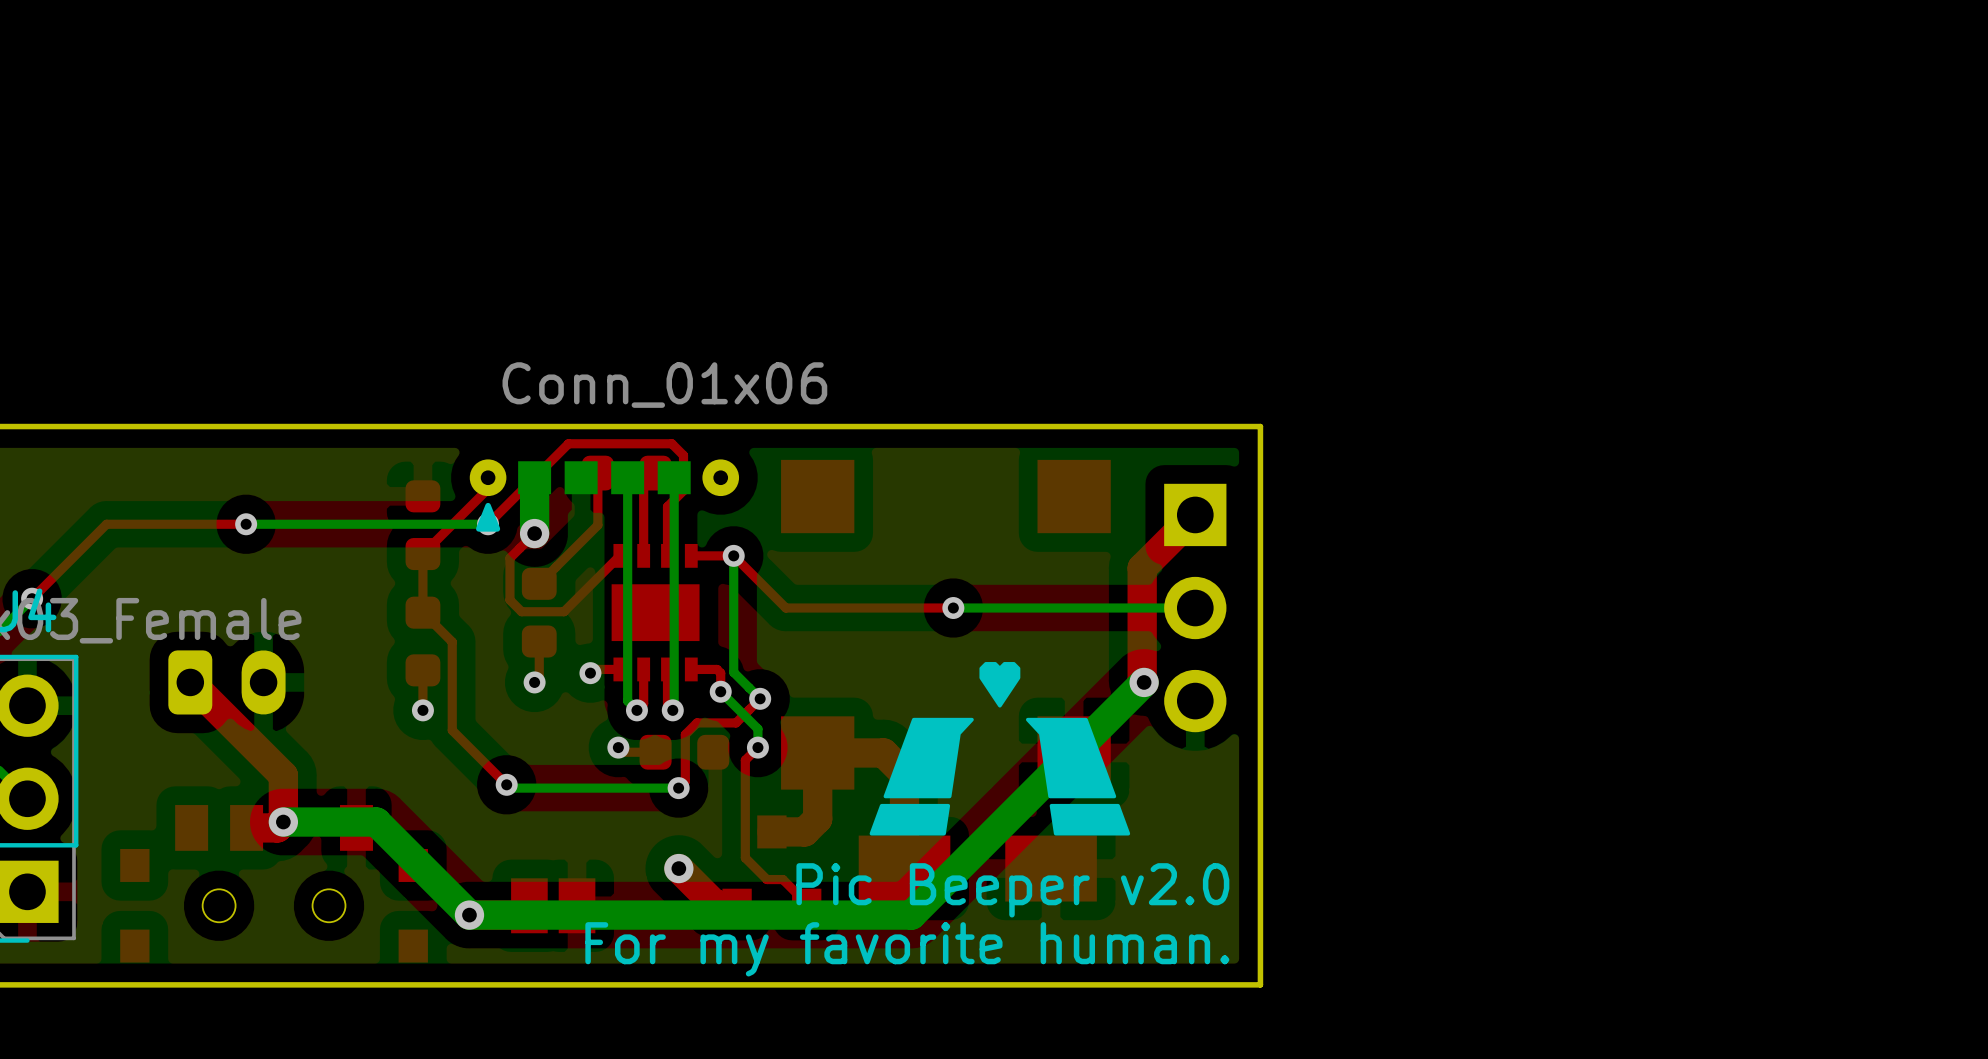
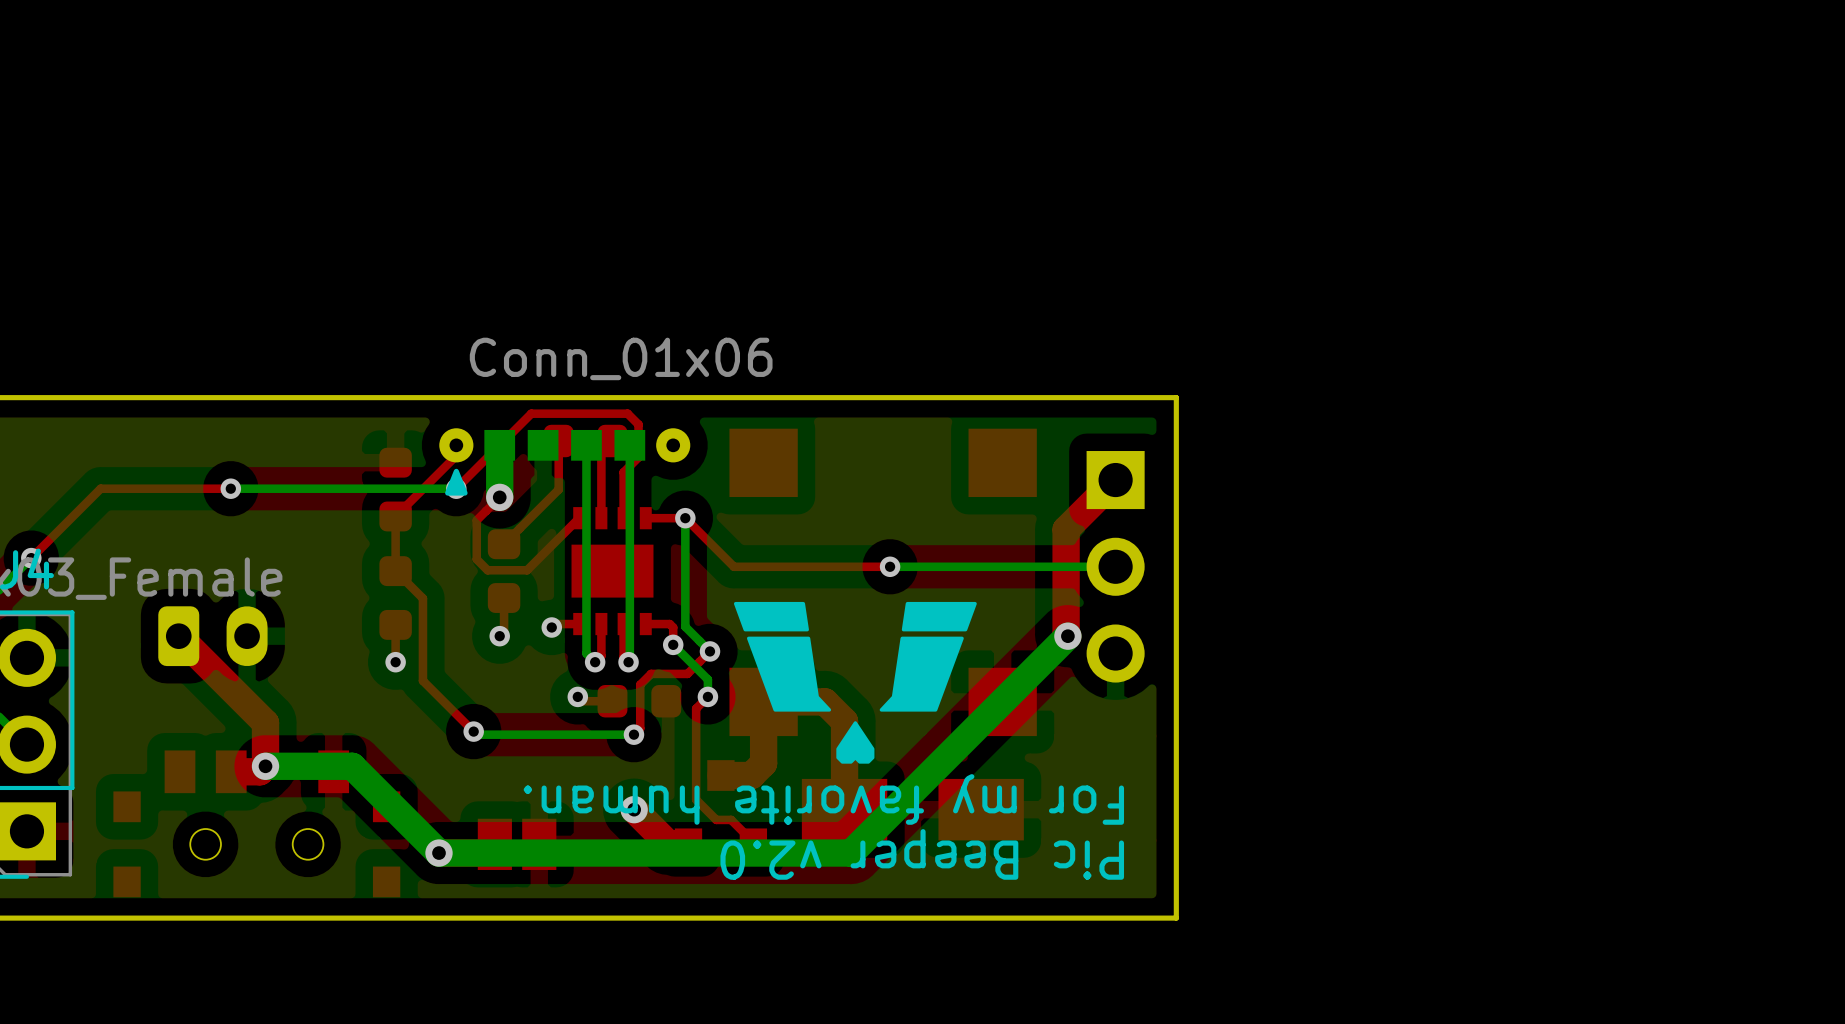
drawing: none -> [733, 601, 832, 712]
drawing shape: [979, 662, 1021, 708] -> [879, 601, 977, 712]
drawing shape: [869, 717, 974, 836] -> [836, 721, 875, 764]
drawing: [1025, 717, 1131, 836] -> none
text rotation: 0° (1012, 890) -> 180° (922, 854)
text rotation: 0° (907, 949) -> 180° (823, 799)

